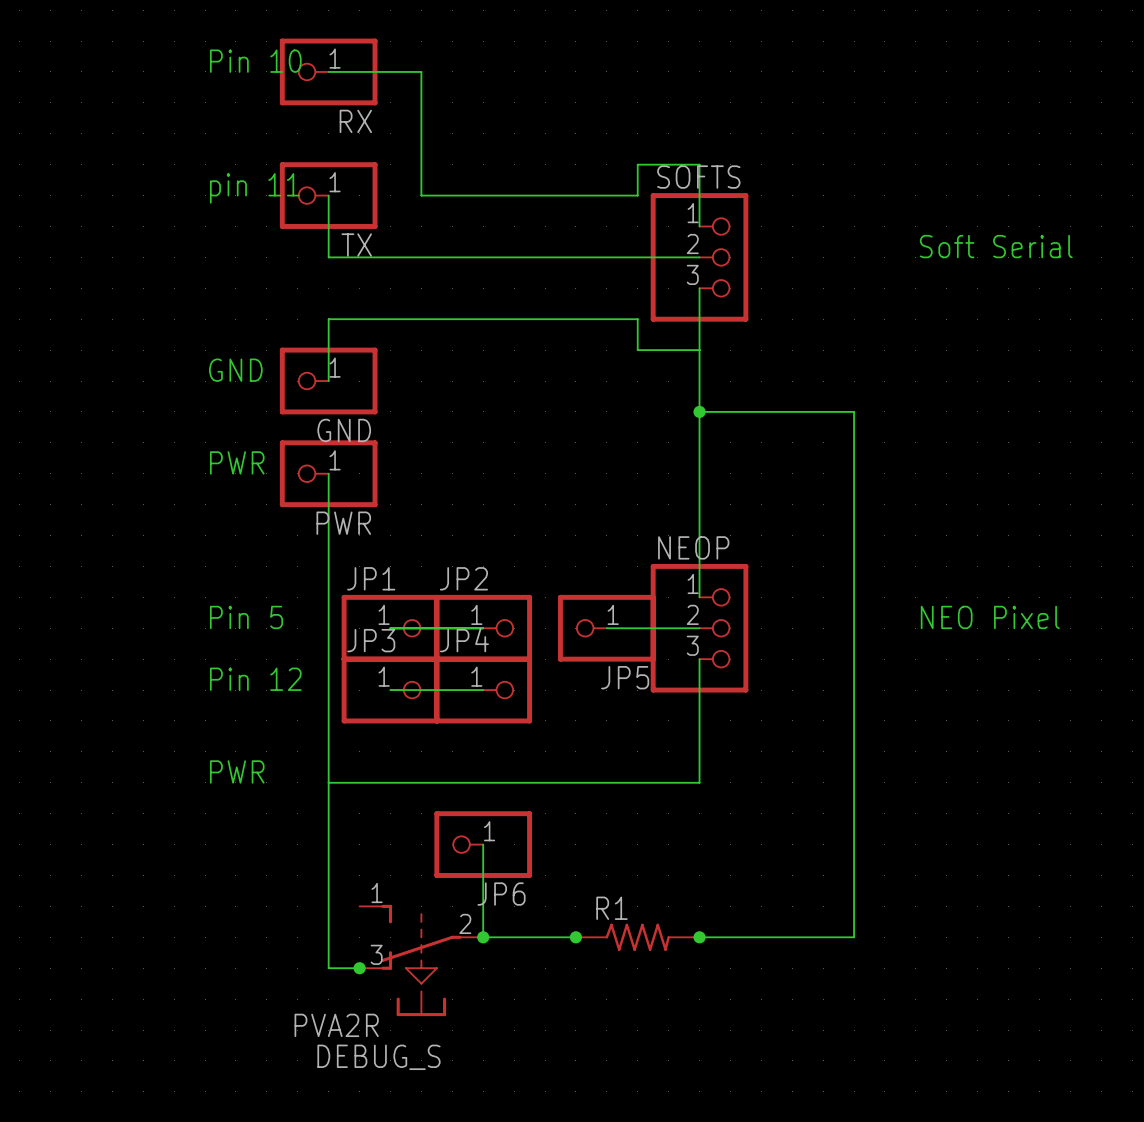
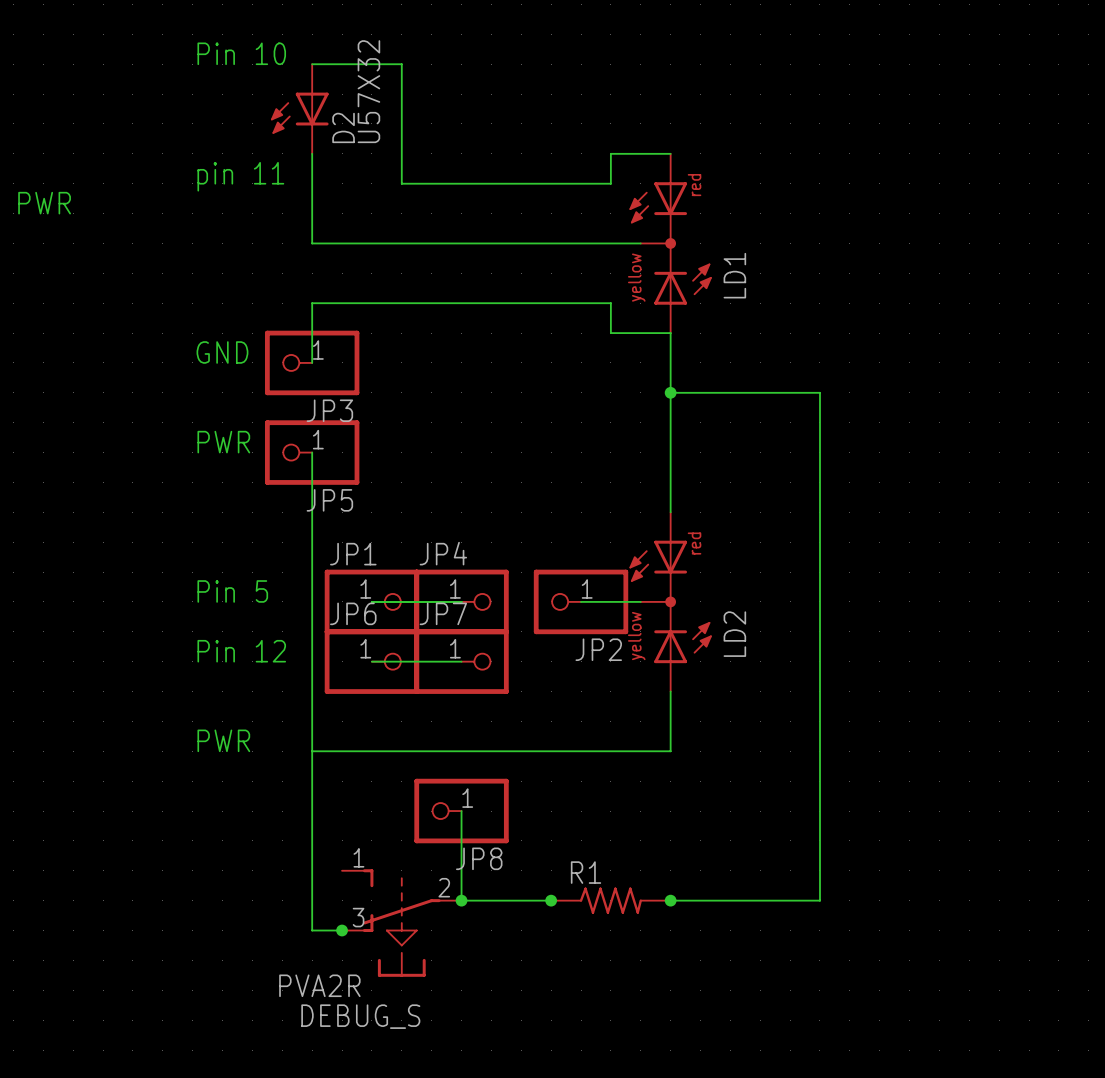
RX: (328, 71) -> none
D2: none -> U57X32 (299, 109)
wire: none -> (312, 153) (312, 183)
TX: (328, 195) -> none
text: none -> PWR (44, 203)
text: Soft Serial (996, 246) -> none
SOFTS: (699, 257) -> none
LD1: none -> (670, 243)
GND name: GND (344, 430) -> JP3 (329, 410)
PWR name: PWR (343, 523) -> JP5 (329, 500)
JP2 name: JP2 (463, 578) -> JP4 (443, 553)
text: NEO Pixel (990, 617) -> none
NEOP: (699, 628) -> none
LD2: none -> (670, 601)
JP3 name: JP3 (371, 640) -> JP6 (353, 613)
JP4 name: JP4 (464, 640) -> JP7 (443, 613)
JP5 name: JP5 (625, 677) -> JP2 (598, 649)
JP6 name: JP6 (501, 894) -> JP8 (479, 858)

